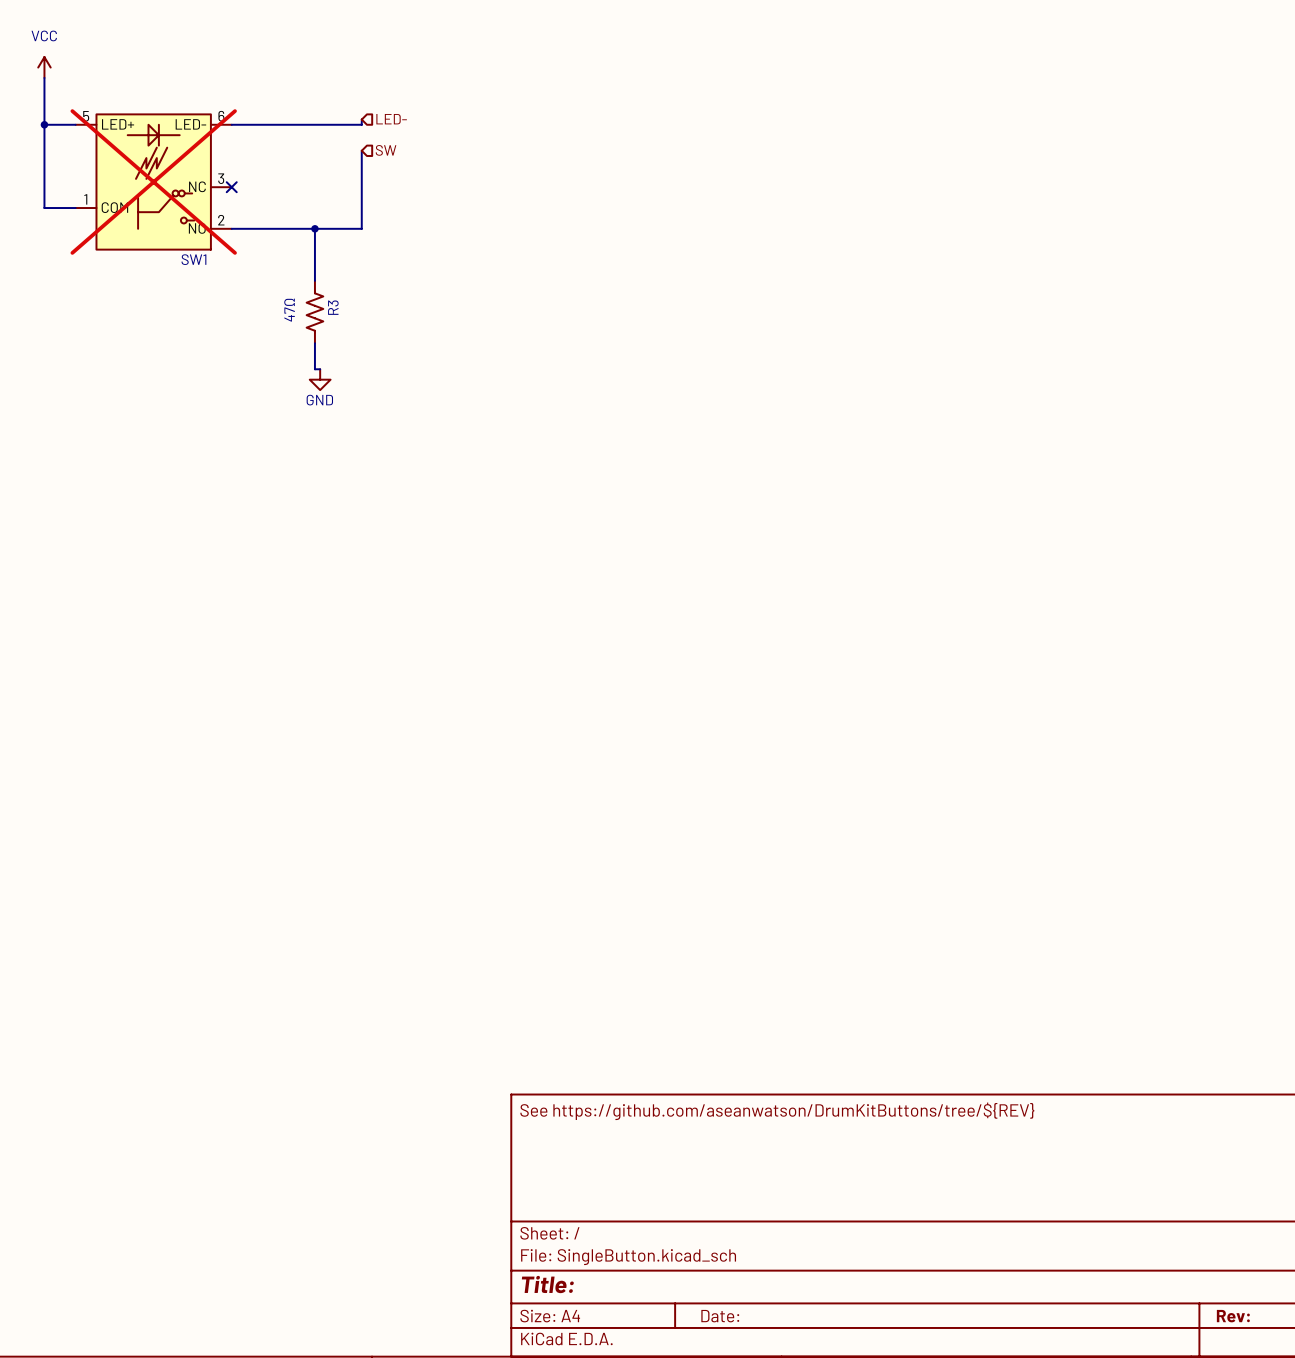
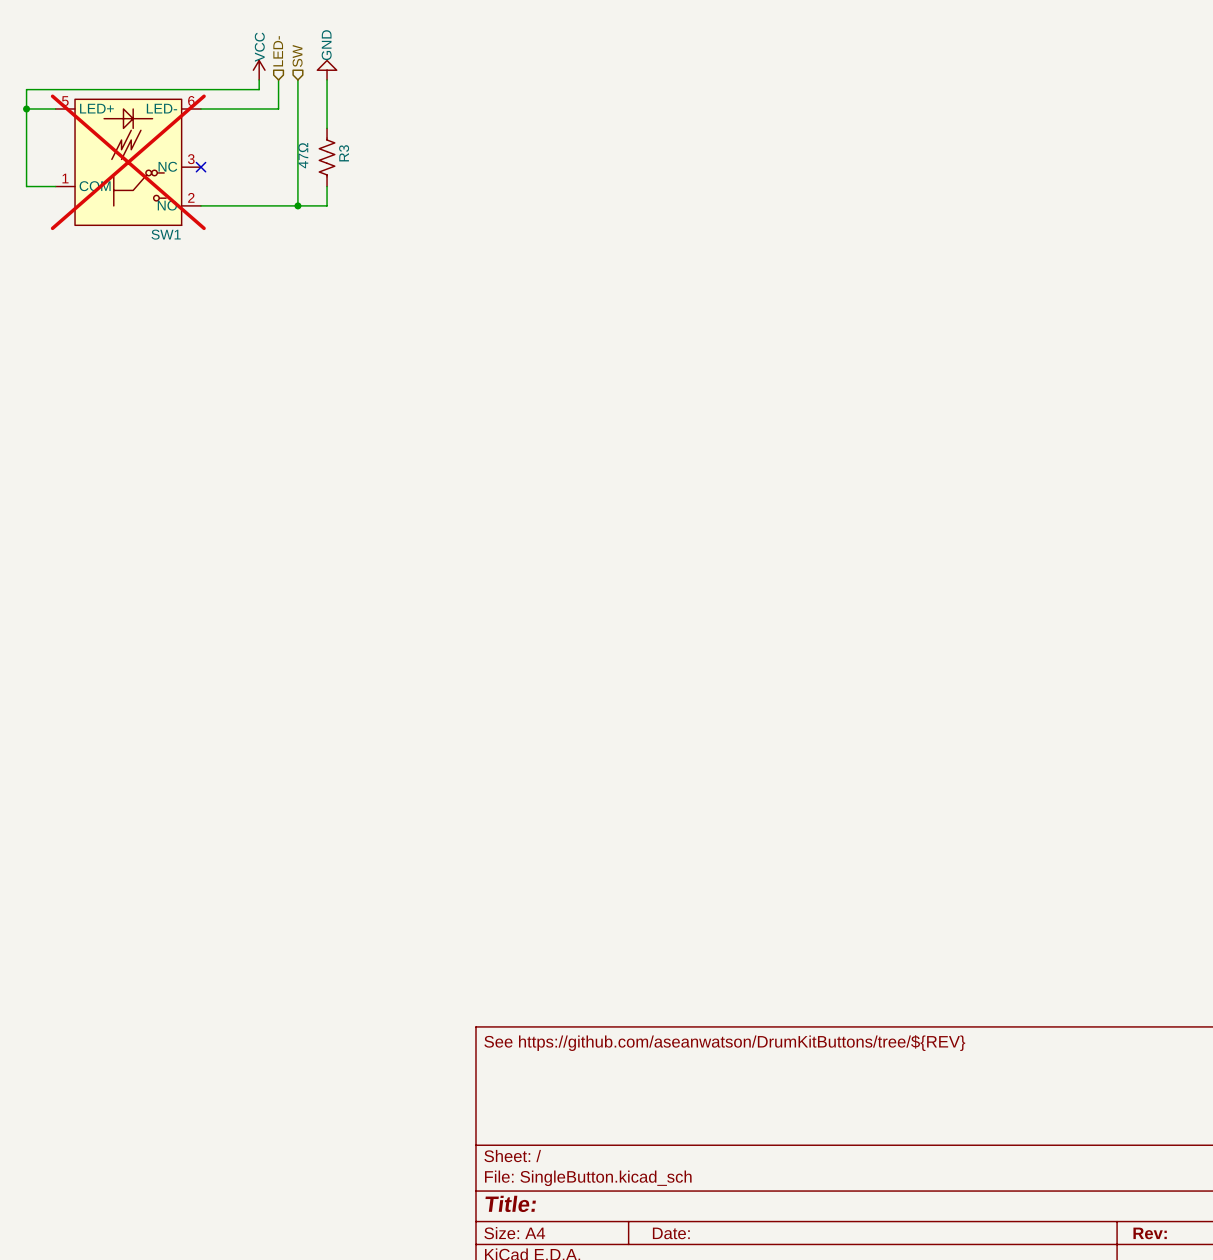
power symbol: VCC (44, 67) -> none
power symbol: none -> VCC (259, 70)
power symbol: none -> GND (327, 70)
wire: (44, 77) (44, 208) (75, 208) -> none
wire: none -> (259, 79) (259, 89) (26, 89) (26, 186) (55, 186)
wire: none -> (278, 79) (278, 108) (201, 108)
wire: none -> (297, 79) (297, 205)
wire: (361, 119) (361, 124) (231, 124) -> none
hierarchical label rotation: 0° (391, 119) -> 90° counterclockwise (278, 51)
hierarchical label position: LED- (391, 119) -> LED- (278, 51)
wire: (44, 124) (75, 124) -> (26, 108) (55, 108)
junction position: (44, 124) -> (26, 108)
wire: (361, 150) (361, 228) (231, 228) -> none
hierarchical label rotation: 0° (386, 150) -> 90° counterclockwise (297, 55)
hierarchical label position: SW (386, 150) -> SW (297, 55)
SW1 position: (153, 182) -> (128, 162)
no-connect mark position: (231, 187) -> (201, 167)
wire: none -> (327, 186) (327, 205) (201, 205)
wire: (314, 228) (314, 280) -> (327, 79) (327, 128)
junction position: (314, 228) -> (297, 205)
R3 position: (314, 312) -> (327, 157)
wire: (314, 343) (314, 369) (320, 369) -> none
power symbol: GND (320, 379) -> none

